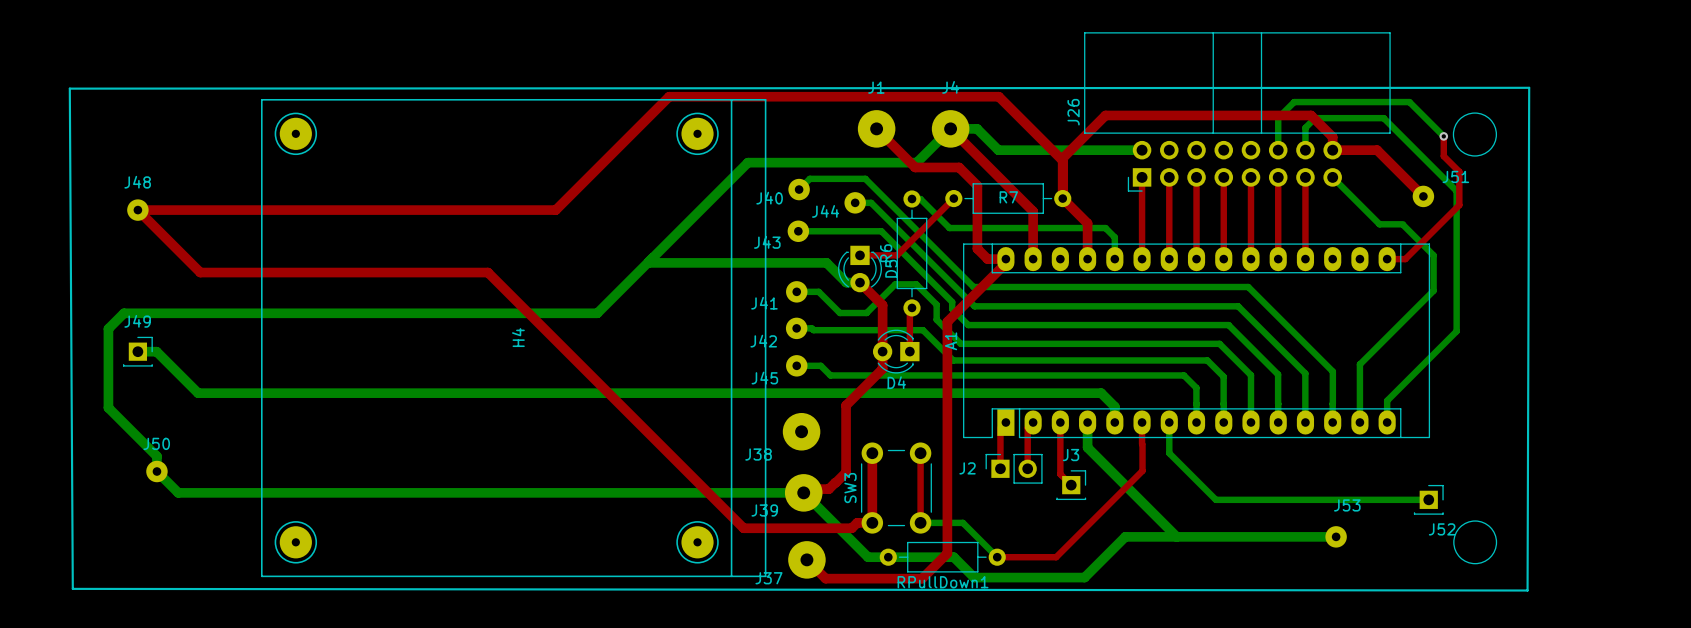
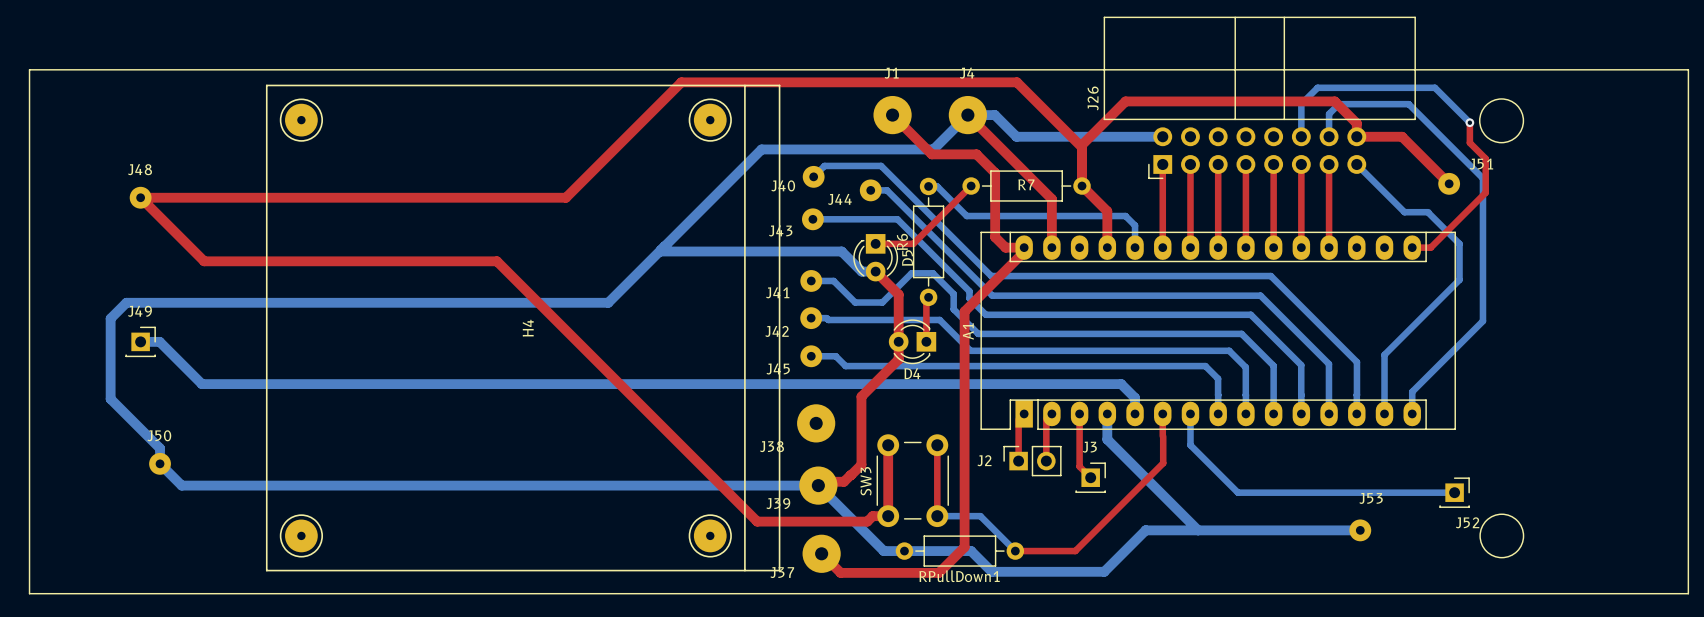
line: (1529, 87) (1527, 590) (72, 588) (69, 88) (1529, 87) -> (29, 69) (29, 593) (1688, 593) (1688, 69) (29, 69)

